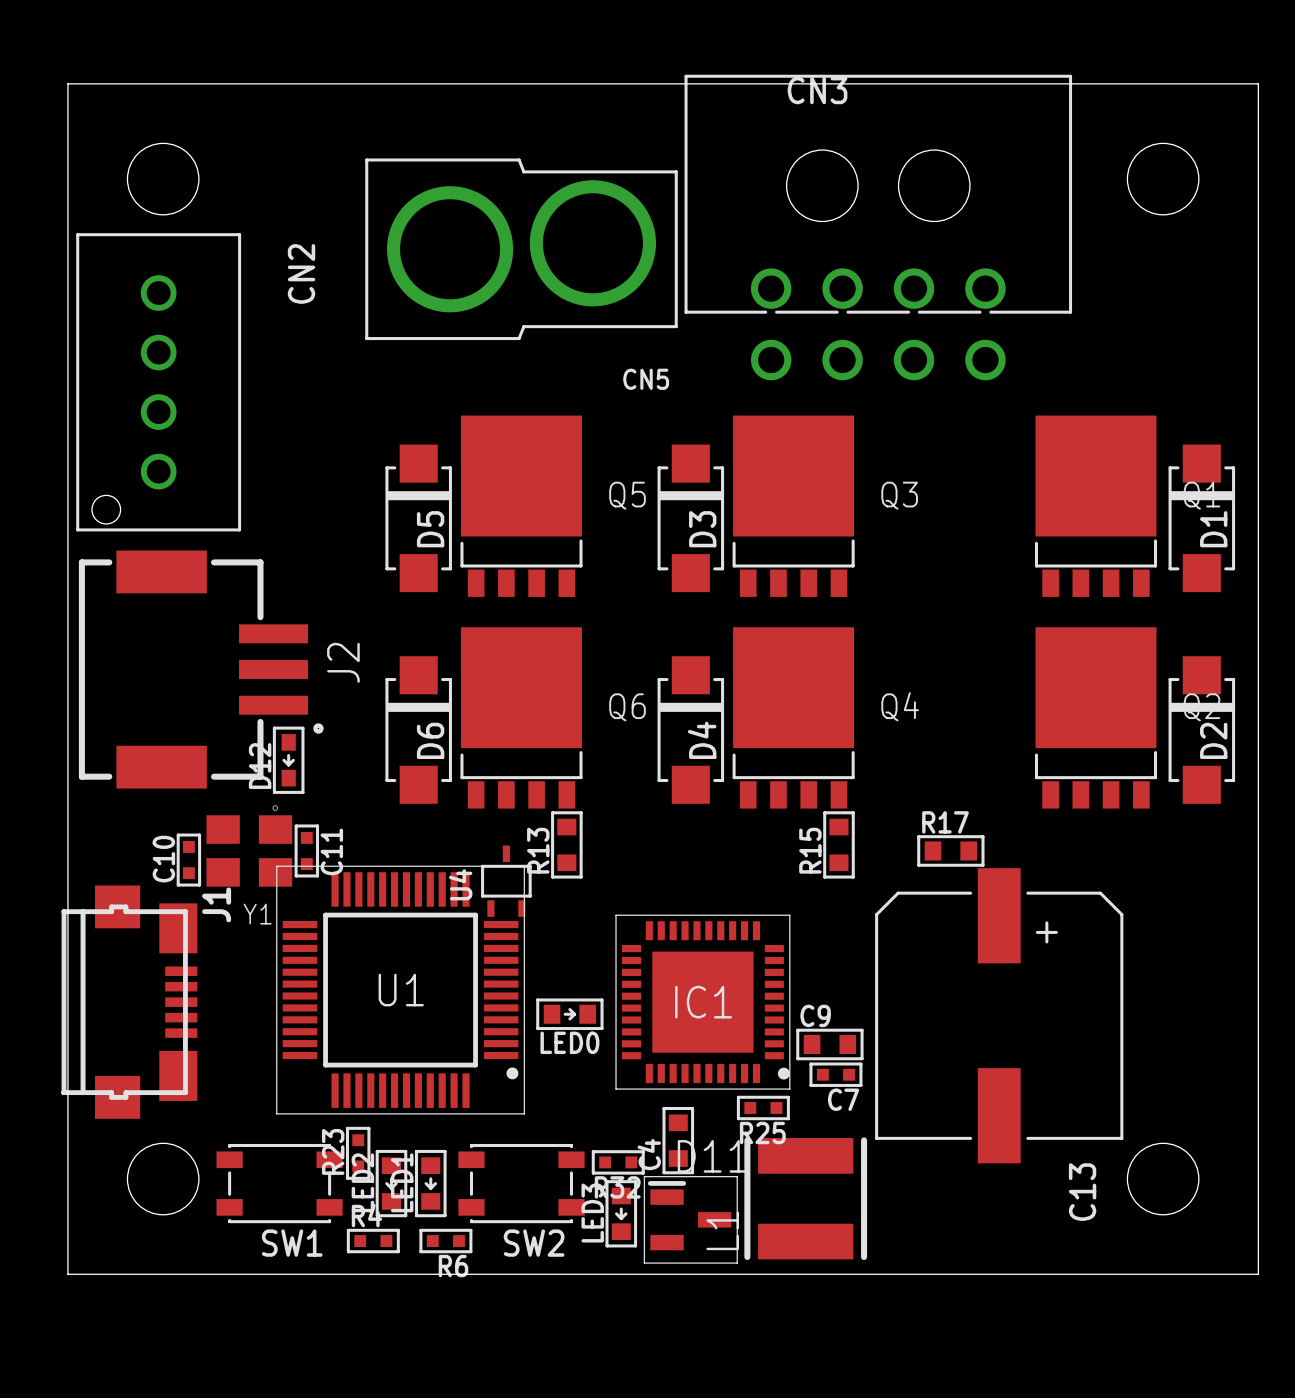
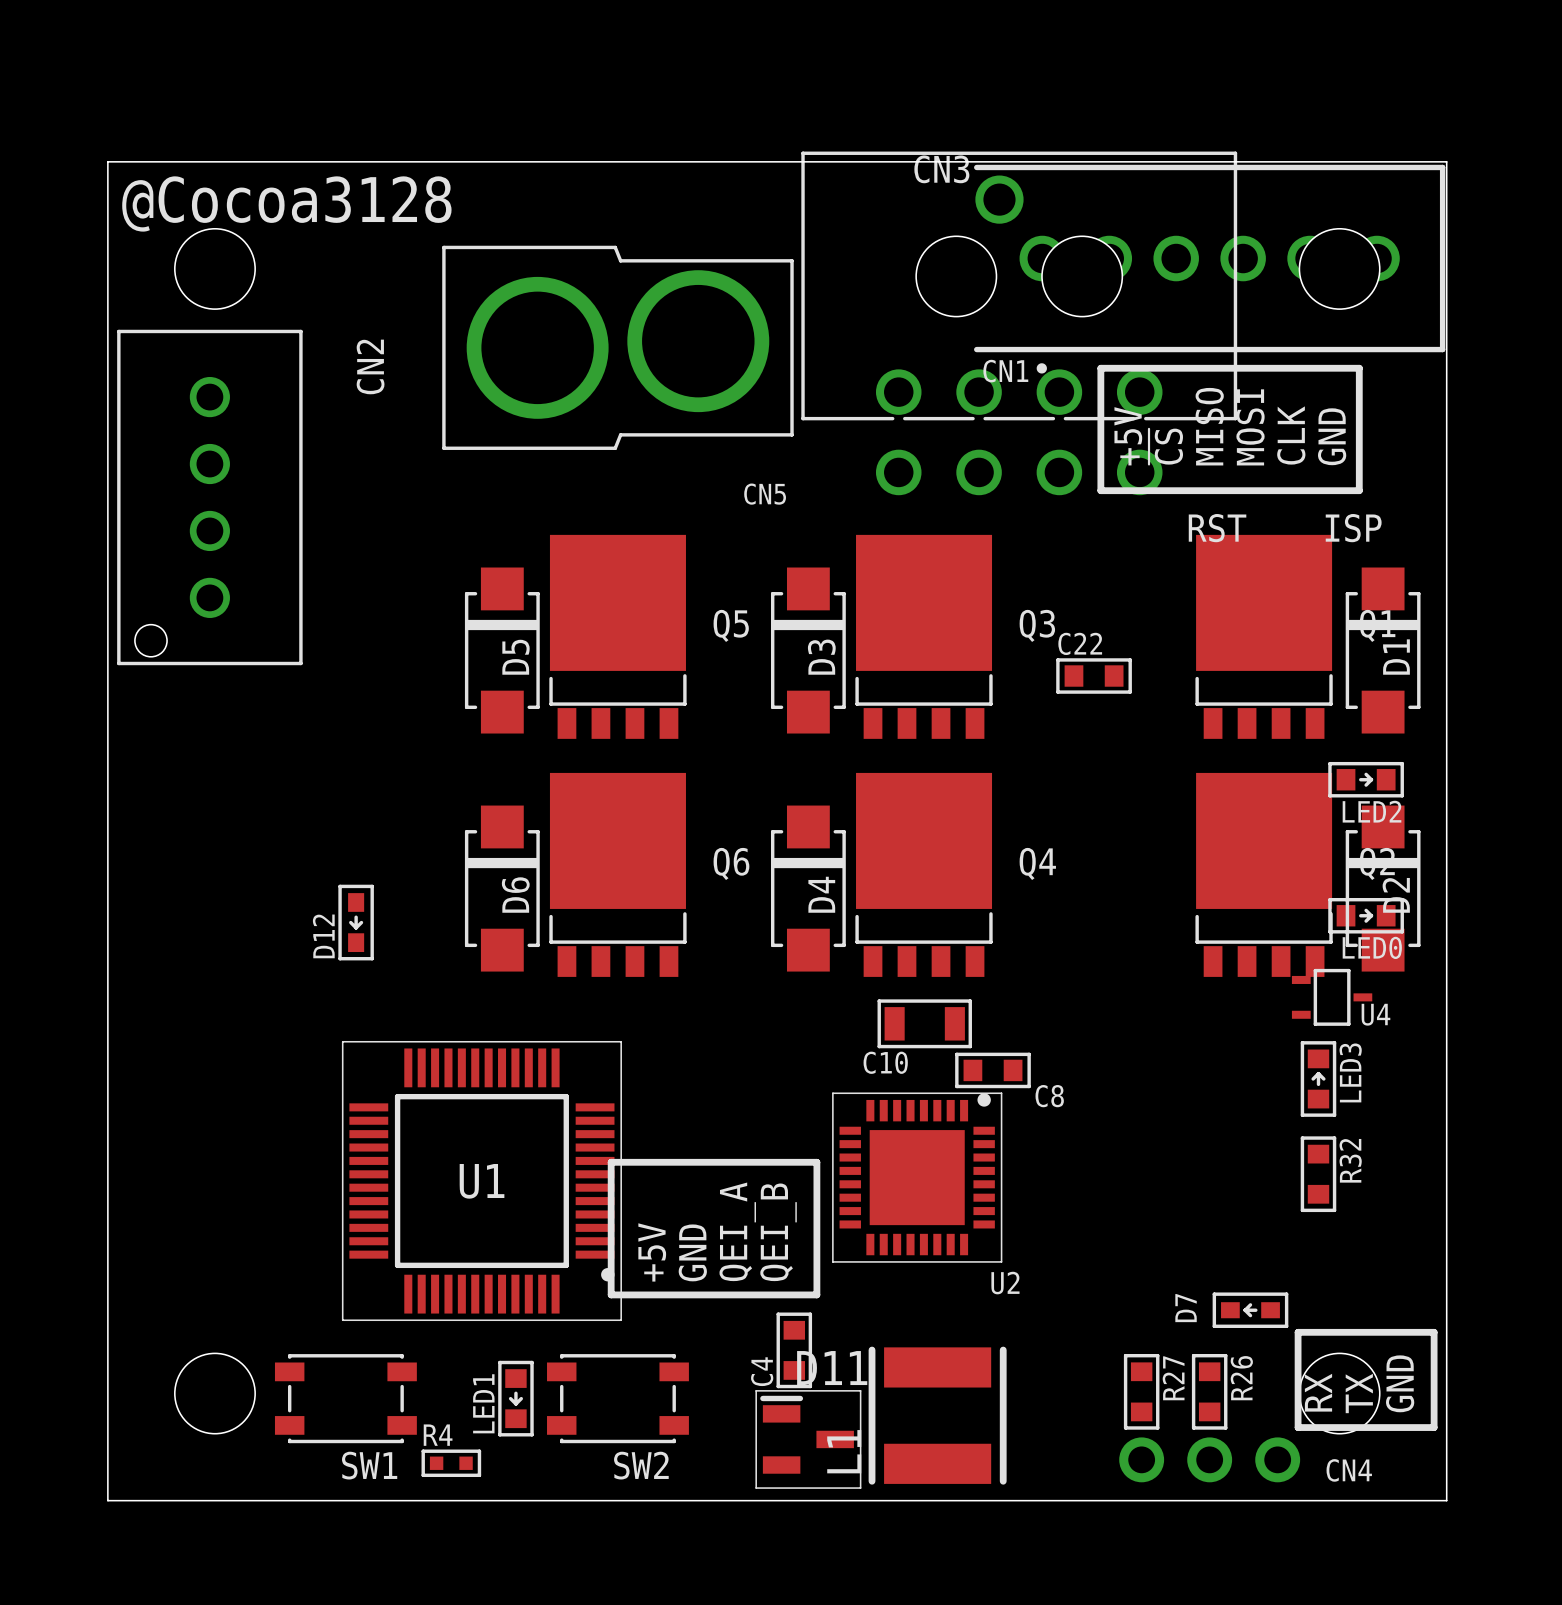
text: none -> @Cocoa3128 (286, 203)
CN1: none -> (1209, 269)
line: none -> (1100, 368) (1359, 368) (1359, 490) (1100, 490) (1100, 368)
text: none -> MISO (1209, 426)
text: none -> MOSI (1250, 427)
text: none -> +5V (1128, 436)
text: none -> GND (1332, 436)
text: none -> CLK (1291, 435)
text: none -> ~{CS} (1166, 446)
text: none -> RST (1217, 528)
text: none -> ISP (1353, 528)
C22: none -> (1094, 676)
J2: (201, 669) -> none
C10 footprint: [176, 833, 202, 887] -> [877, 999, 972, 1049]
R13: (566, 844) -> none
R15: (838, 844) -> none
Y1: (249, 846) -> none
C11: (306, 850) -> none
R17: (950, 850) -> none
U4 rotation: 0° (506, 881) -> 90° clockwise (1332, 997)
U4 position: (506, 881) -> (1332, 997)
U4 name position: U4 (460, 884) -> U4 (1375, 1014)
C8: none -> (993, 1070)
line: none -> (611, 1162) (816, 1162) (816, 1294) (611, 1294) (611, 1162)
U2: none -> (917, 1177)
J1: (129, 1002) -> none
IC1: (702, 1002) -> none
LED0 position: (569, 1014) -> (1366, 915)
C13: (999, 1015) -> none
text: none -> QEI_B (778, 1232)
text: none -> QEI_A (737, 1231)
text: none -> +5V (652, 1252)
C9: (829, 1044) -> none
text: none -> GND (692, 1252)
C7: (835, 1074) -> none
D7: none -> (1250, 1310)
R25: (763, 1107) -> none
line: none -> (1298, 1332) (1298, 1427) (1434, 1427) (1434, 1332) (1298, 1332)
R32 footprint: [591, 1150, 645, 1175] -> [1300, 1136, 1337, 1213]
R23: (358, 1153) -> none
text: none -> GND (1400, 1383)
text: none -> RX (1318, 1392)
R27: none -> (1141, 1391)
R26: none -> (1209, 1391)
text: none -> TX (1359, 1393)
LED2 rotation: 0° (391, 1183) -> 90° counterclockwise (1366, 779)
LED2 position: (391, 1183) -> (1366, 779)
LED3 rotation: 0° (621, 1213) -> 180° (1318, 1078)
LED3 position: (621, 1213) -> (1318, 1078)
CN4: none -> (1209, 1459)
R6: (445, 1241) -> none

